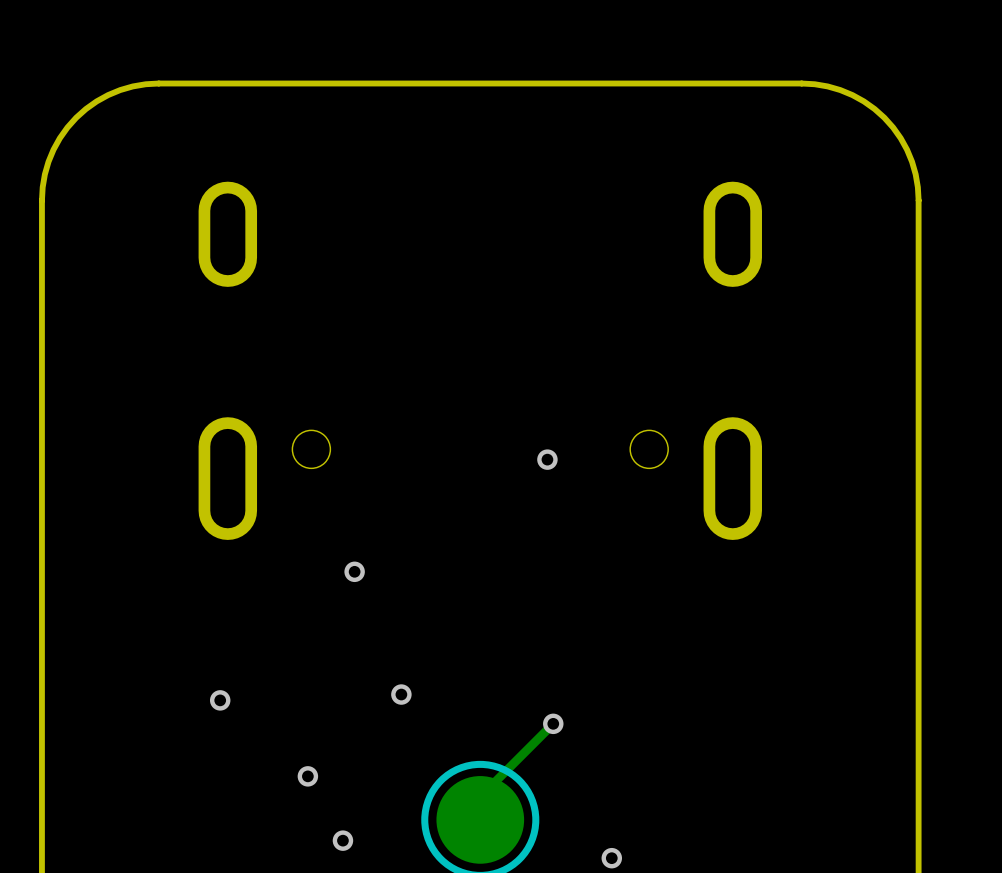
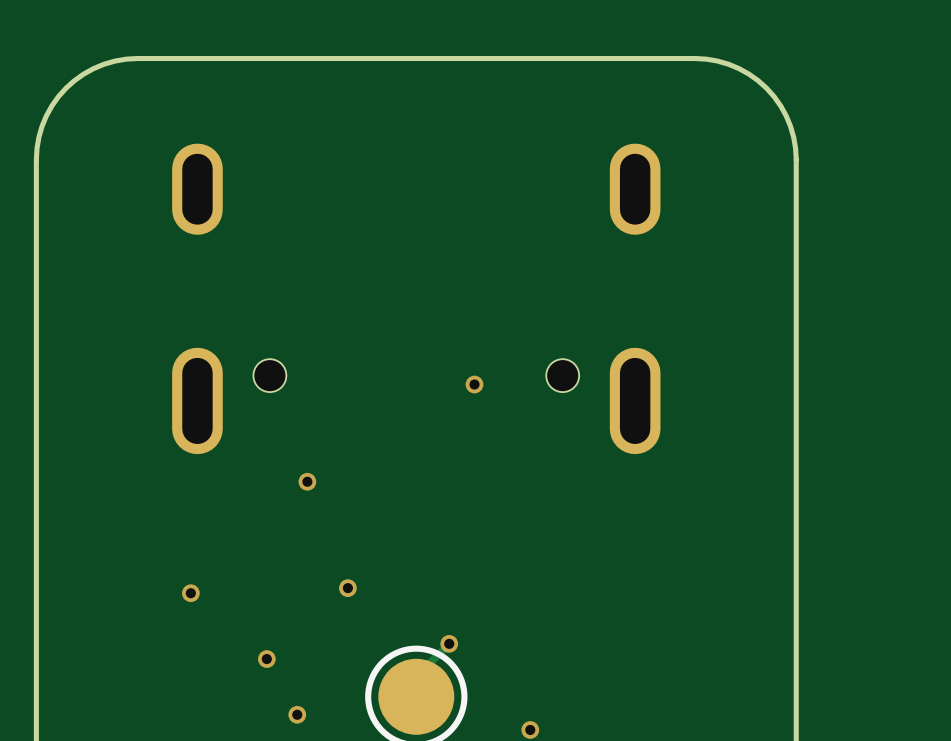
track: (553, 723) (518, 758) -> none
via position: (553, 723) -> (449, 643)

